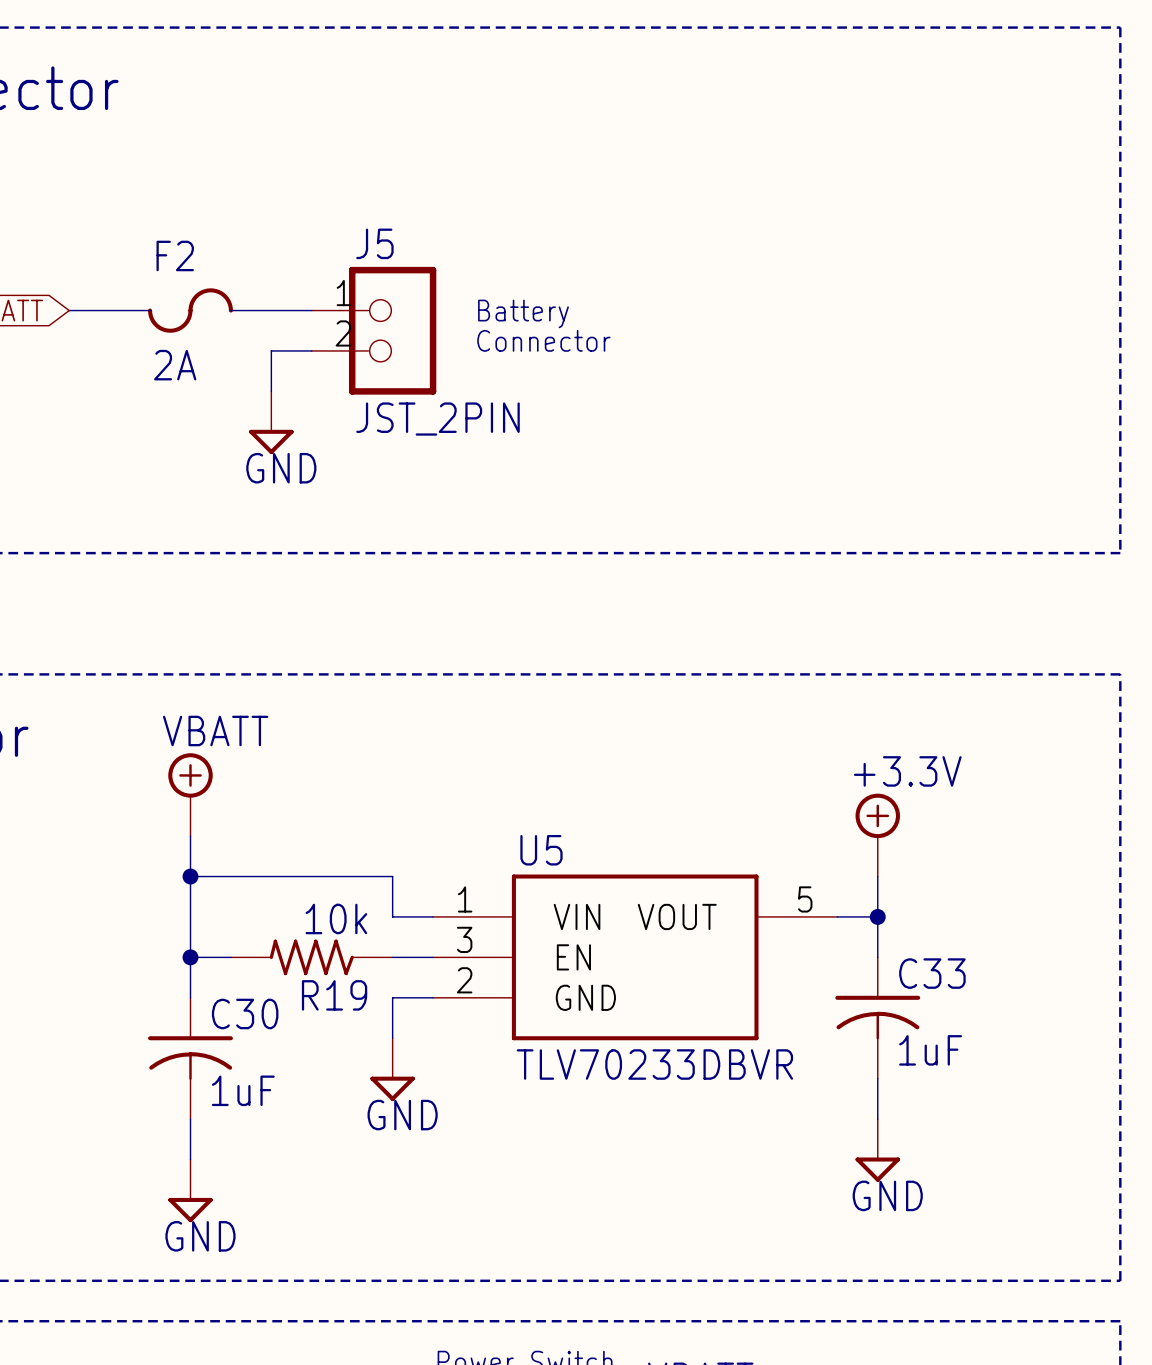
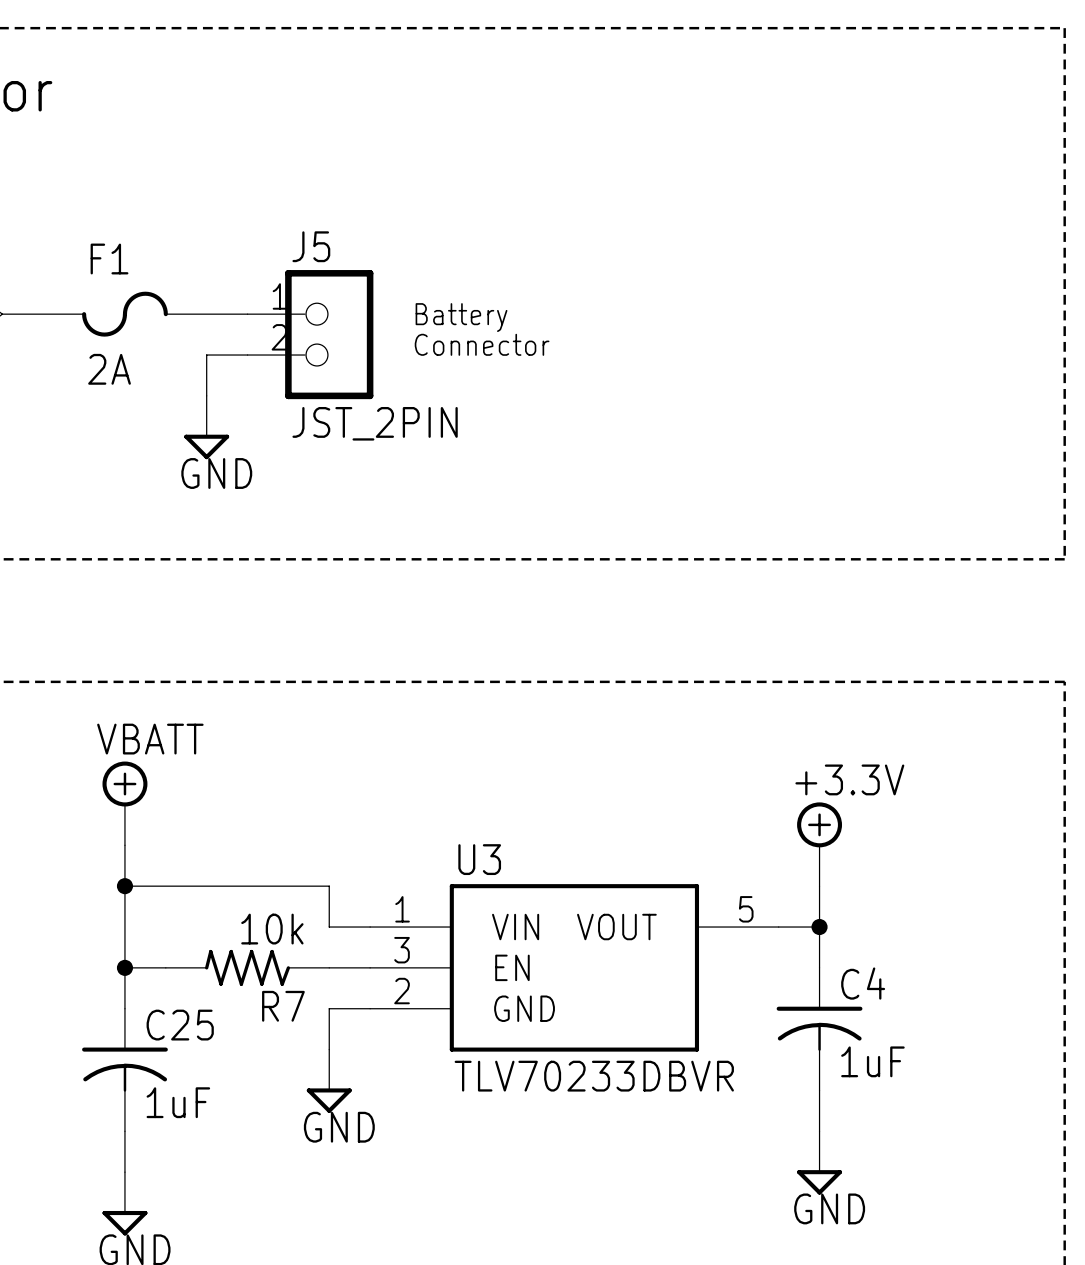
F2 name: F2 (175, 255) -> F1 (109, 259)
U5 name: U5 (541, 850) -> U3 (479, 859)
C33 name: C33 (932, 973) -> C4 (863, 983)
R19 name: R19 (334, 995) -> R7 (283, 1006)
C30 name: C30 (245, 1013) -> C25 (180, 1025)

